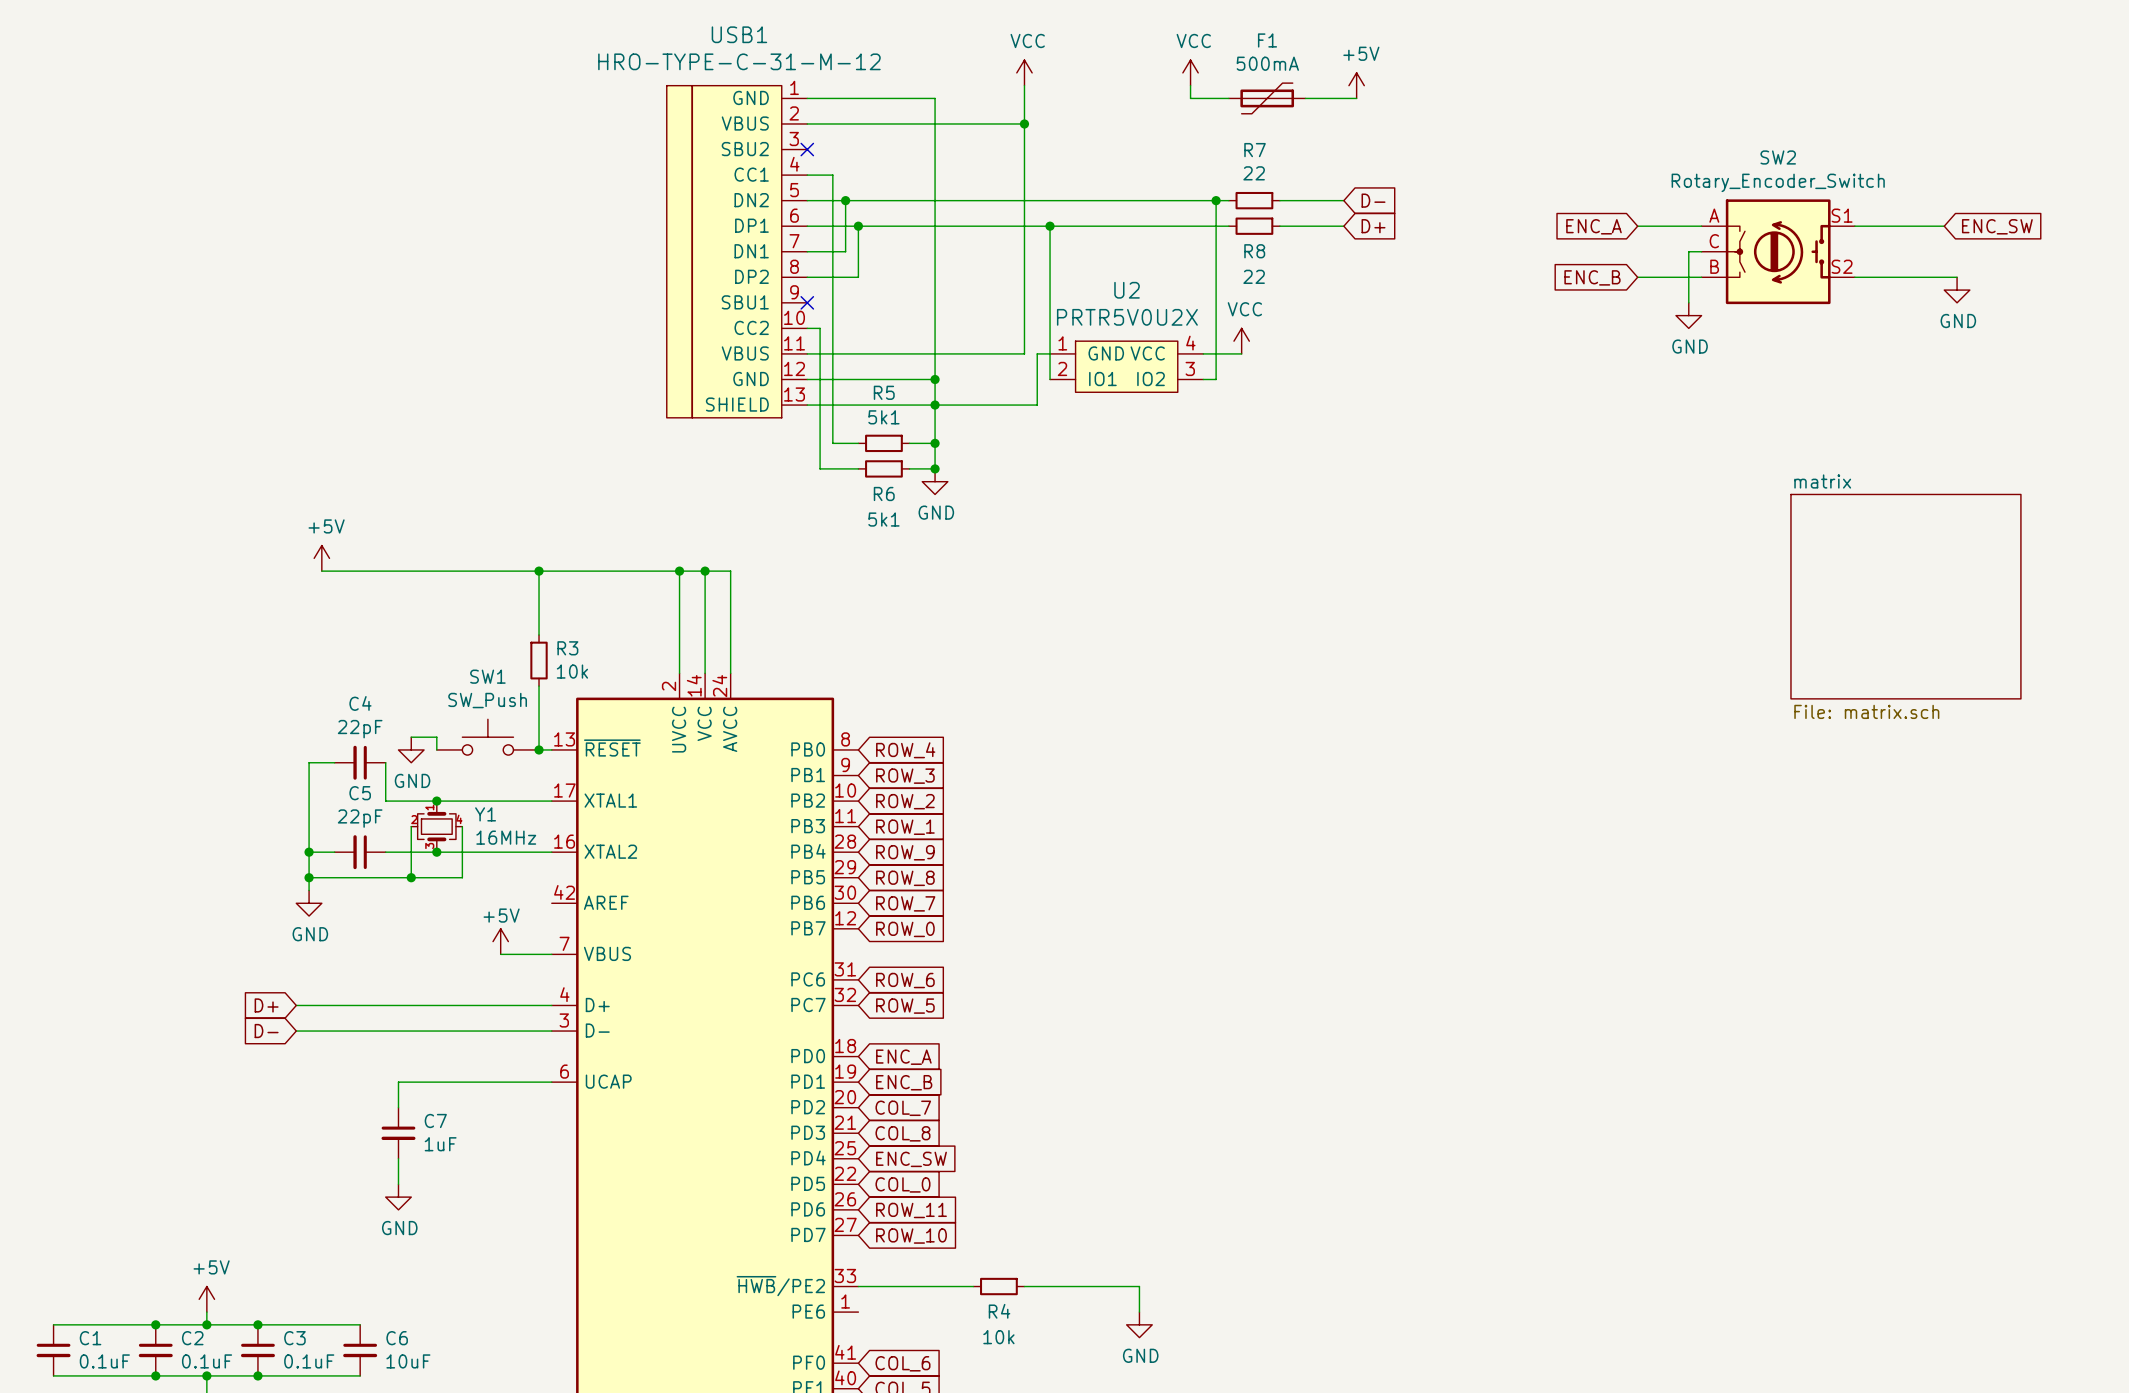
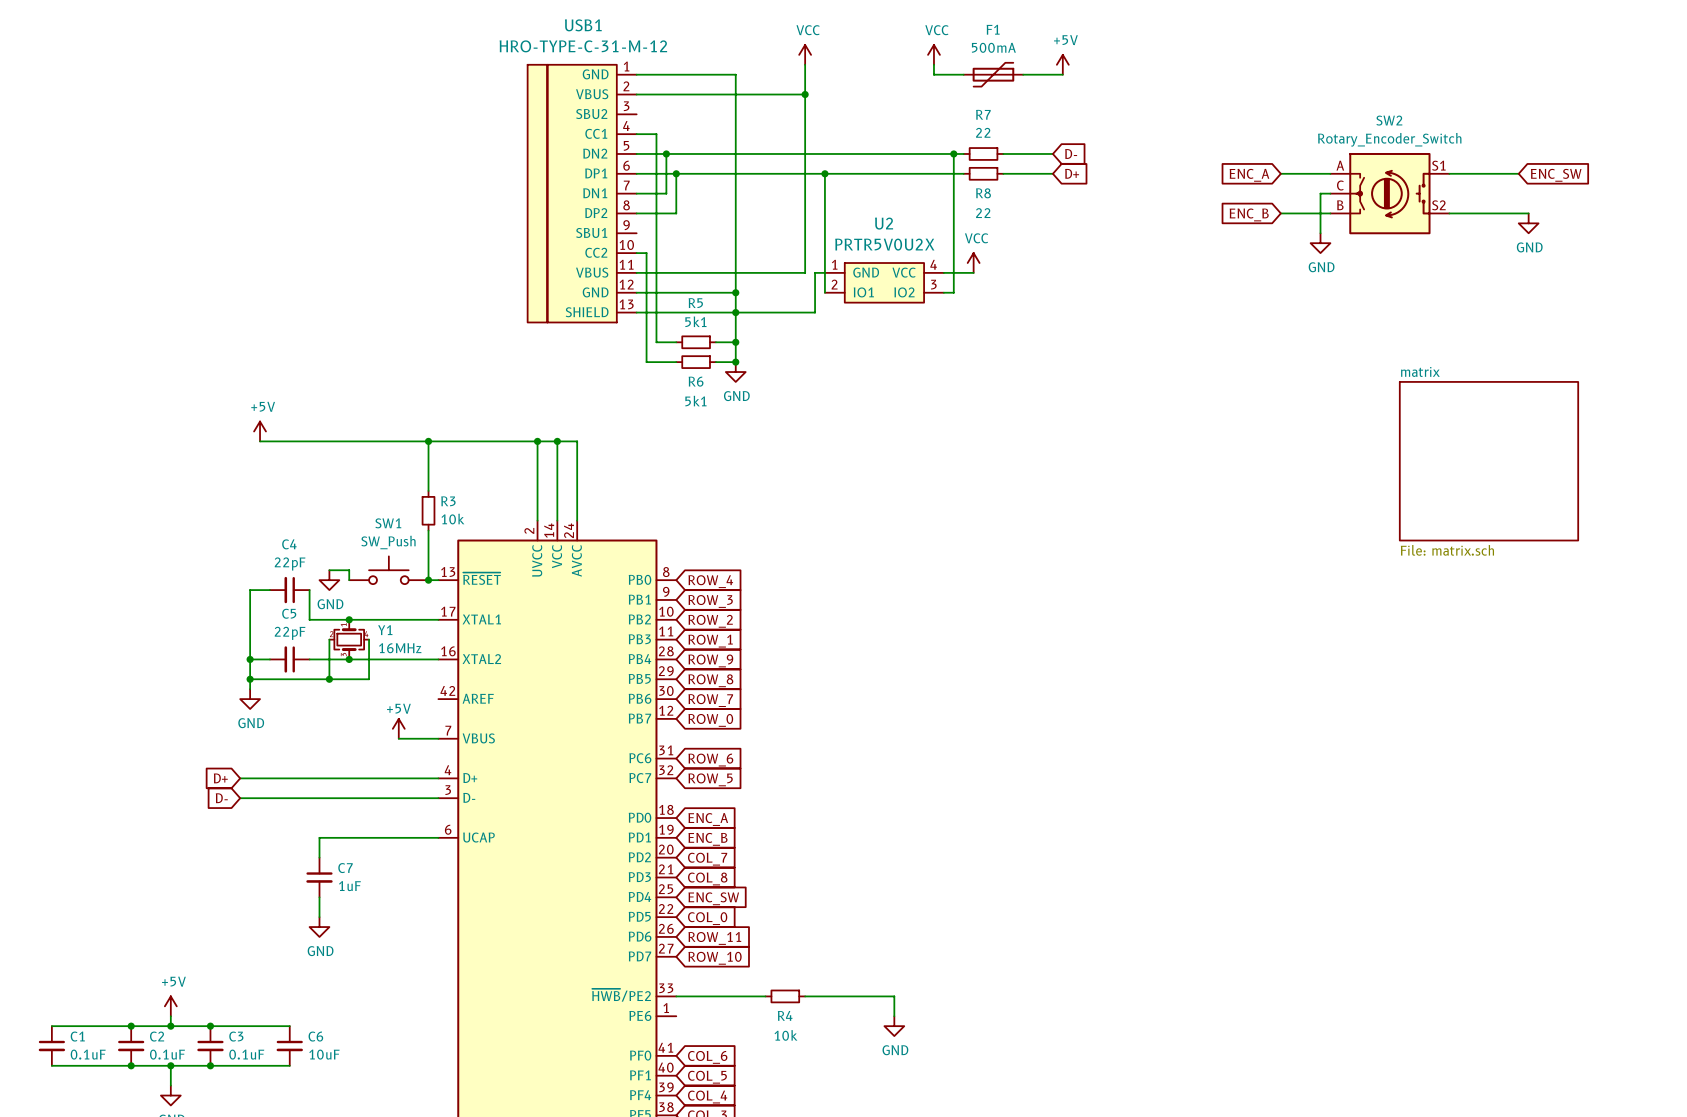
no-connect mark: (807, 149) -> none
no-connect mark: (807, 302) -> none

